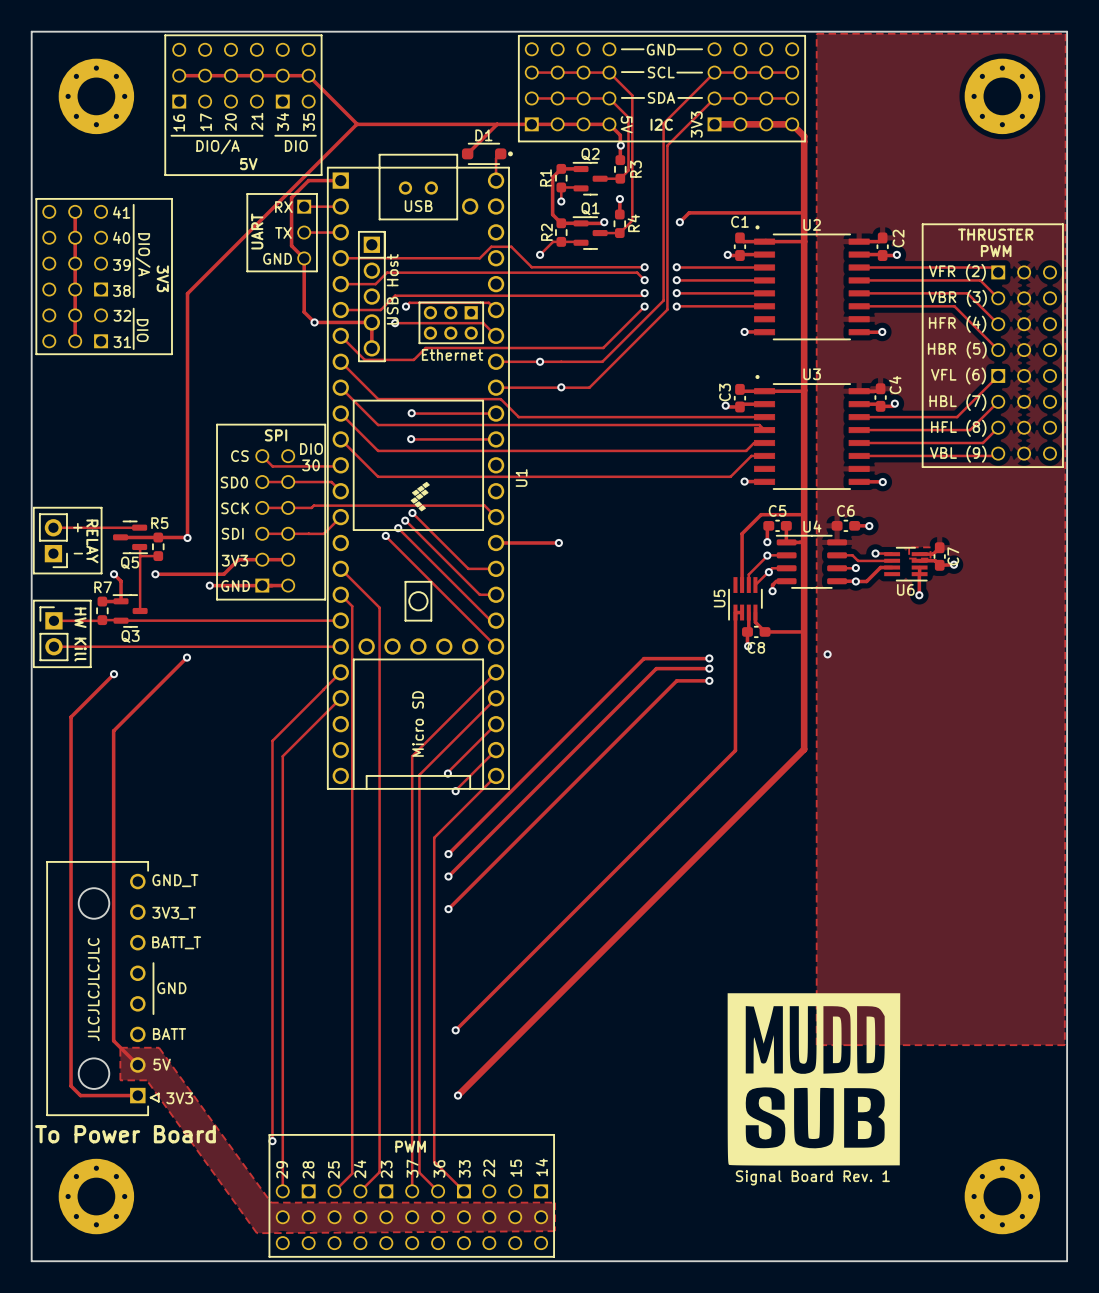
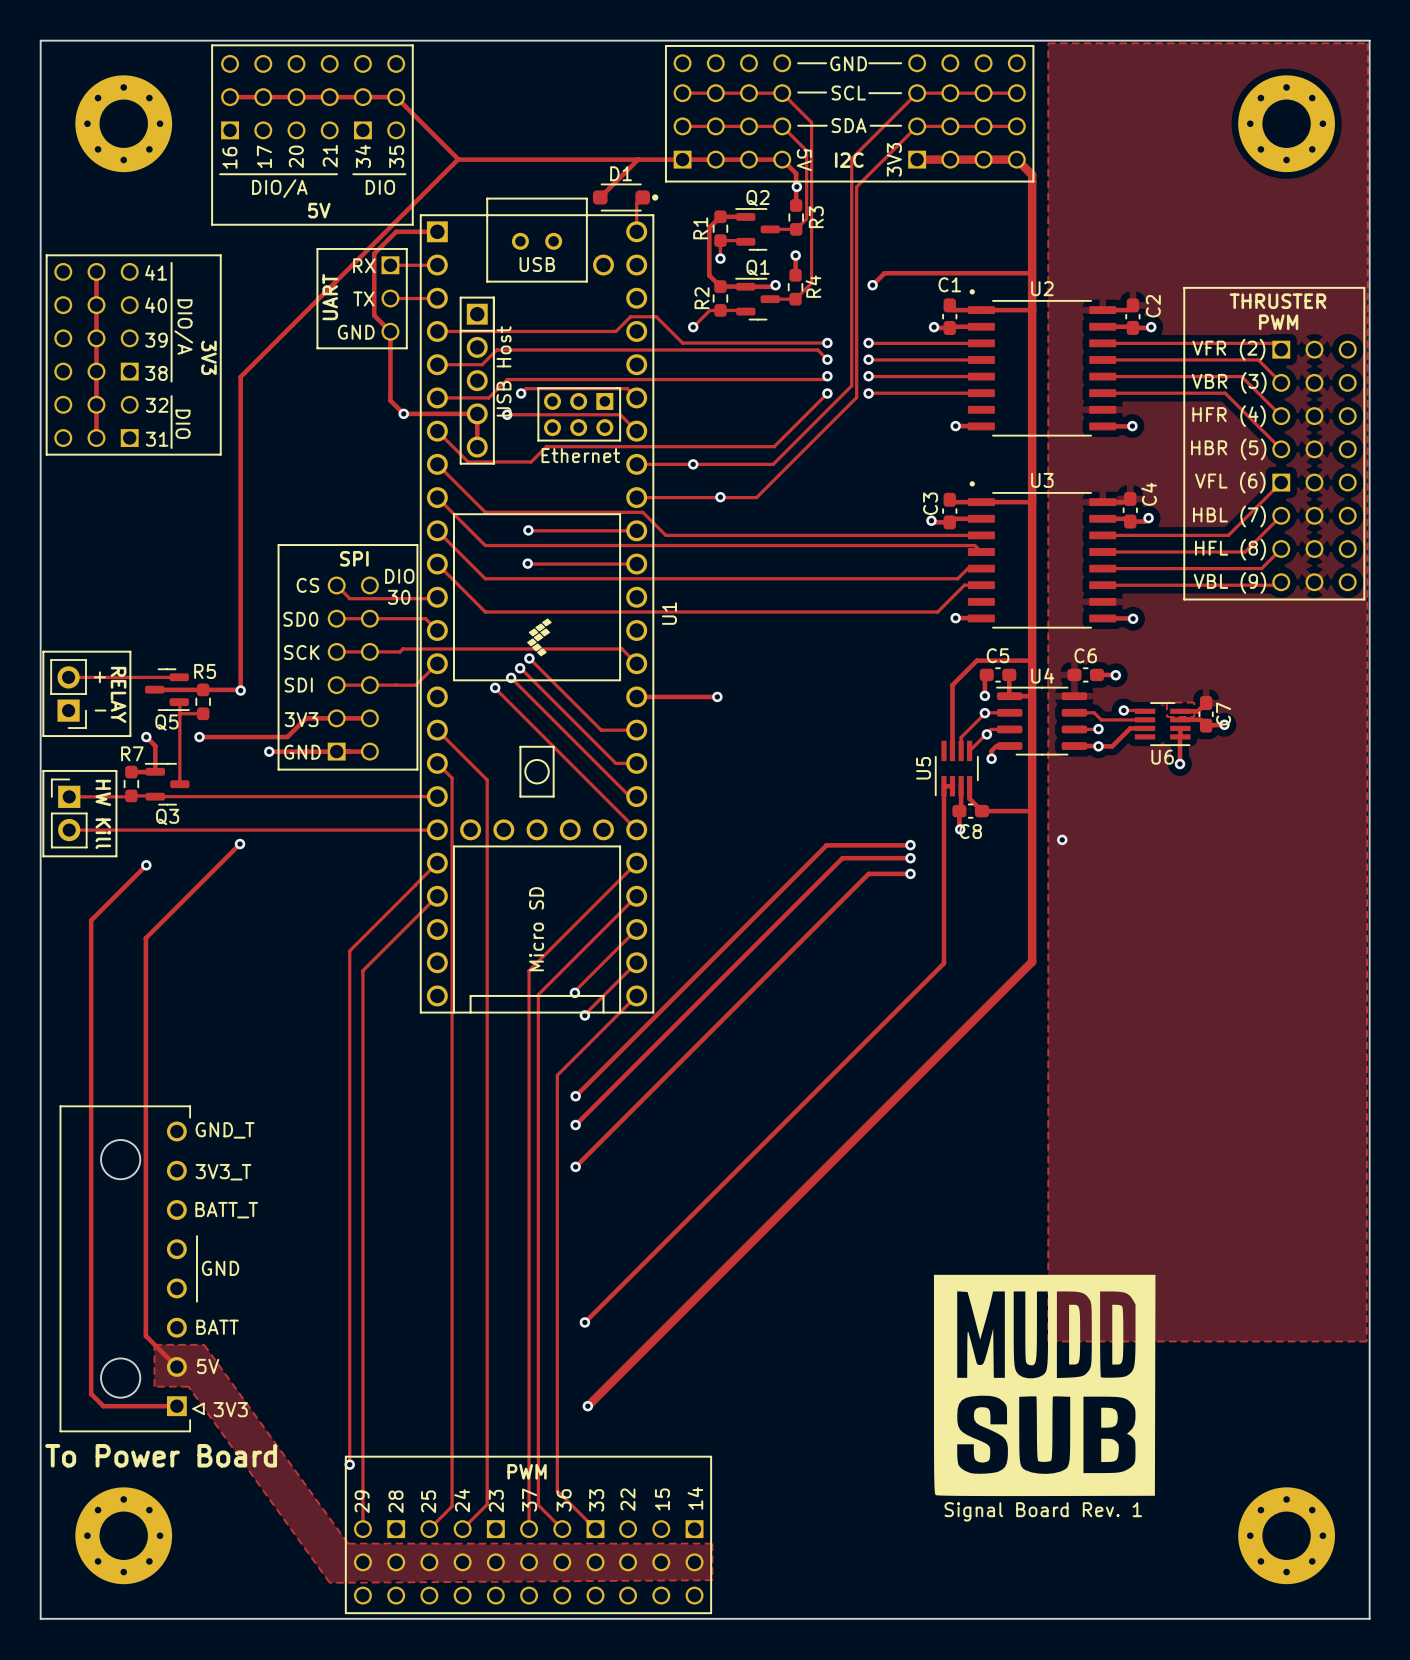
text: JLCJLCJLCJLC (93, 989) -> none

